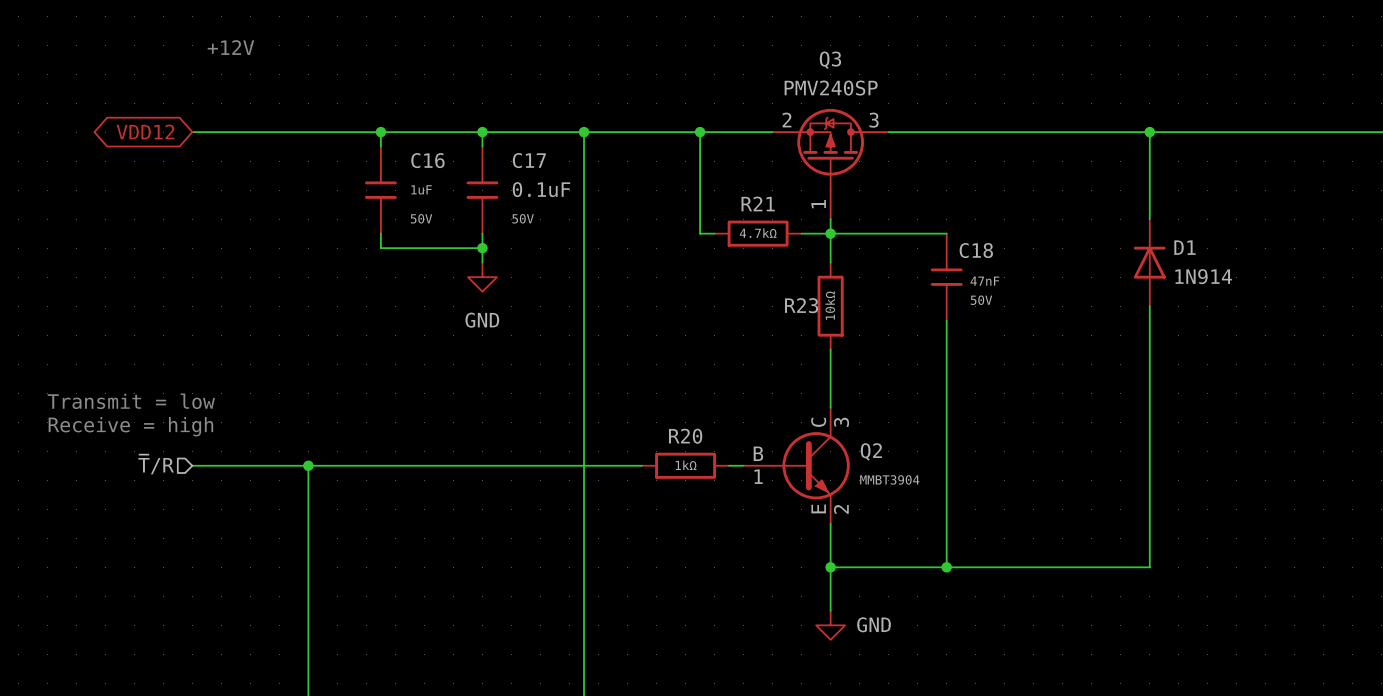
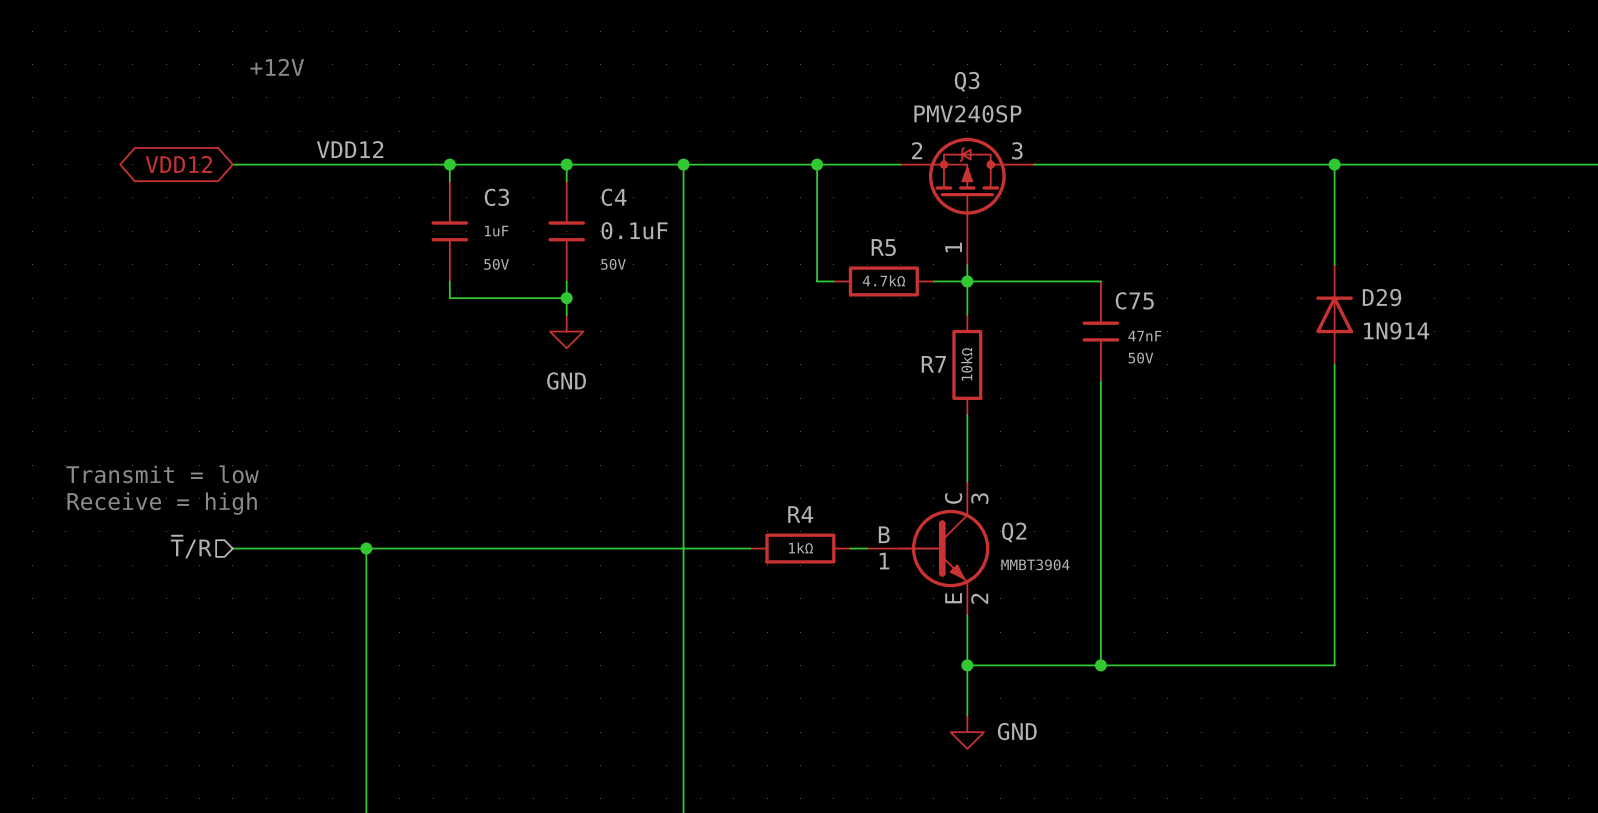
label: none -> VDD12 (350, 149)
C16 name: C16 (427, 160) -> C3 (496, 197)
C17 name: C17 (529, 160) -> C4 (614, 197)
R21 name: R21 (758, 203) -> R5 (883, 247)
D1 name: D1 (1184, 247) -> D29 (1381, 297)
C18 name: C18 (976, 250) -> C75 (1134, 300)
R23 name: R23 (801, 305) -> R7 (933, 364)
R20 name: R20 (685, 436) -> R4 (800, 514)

